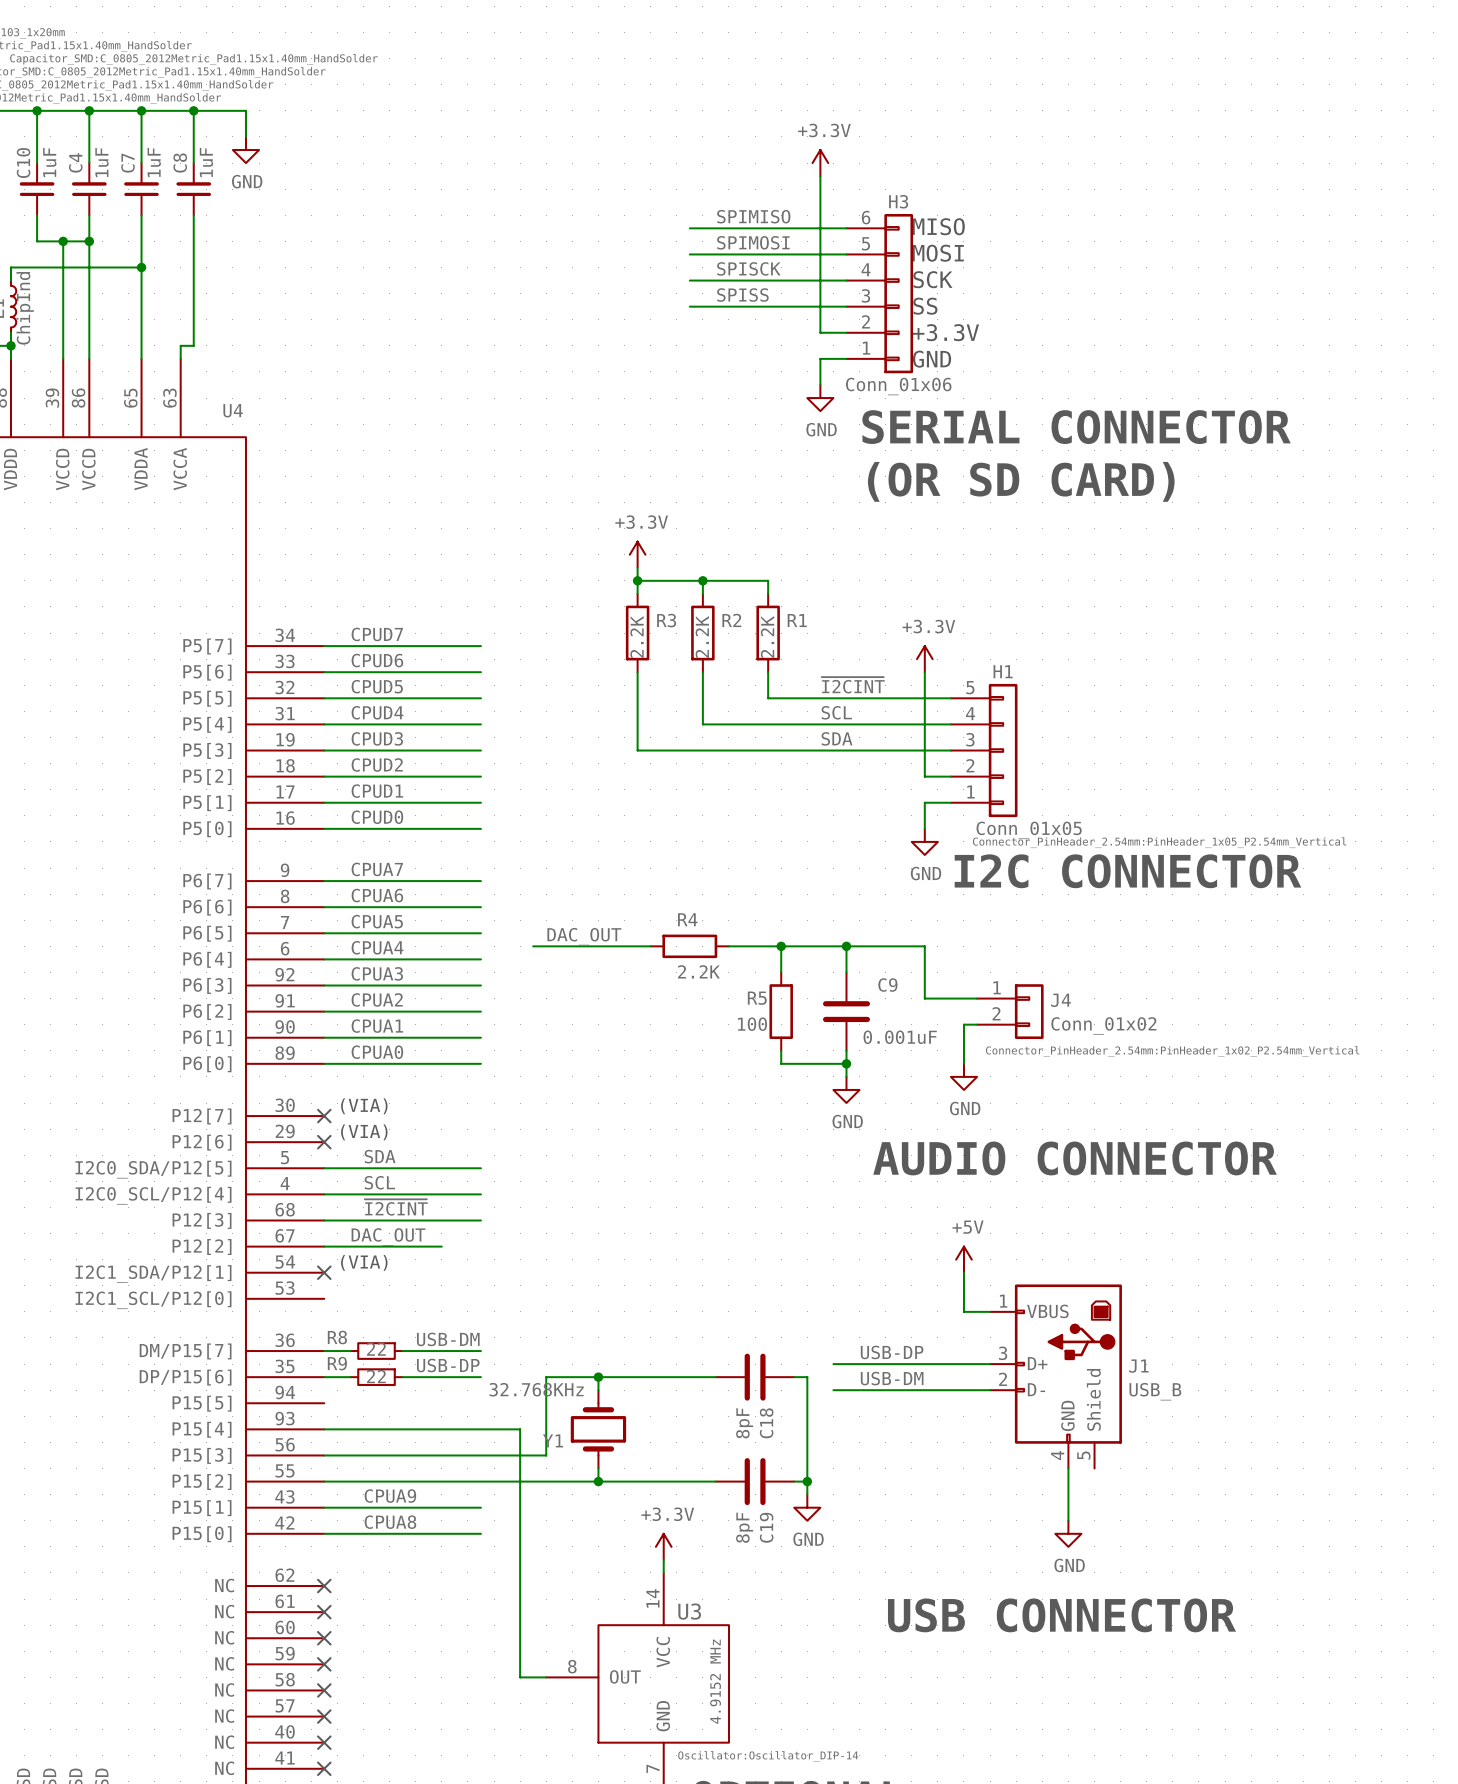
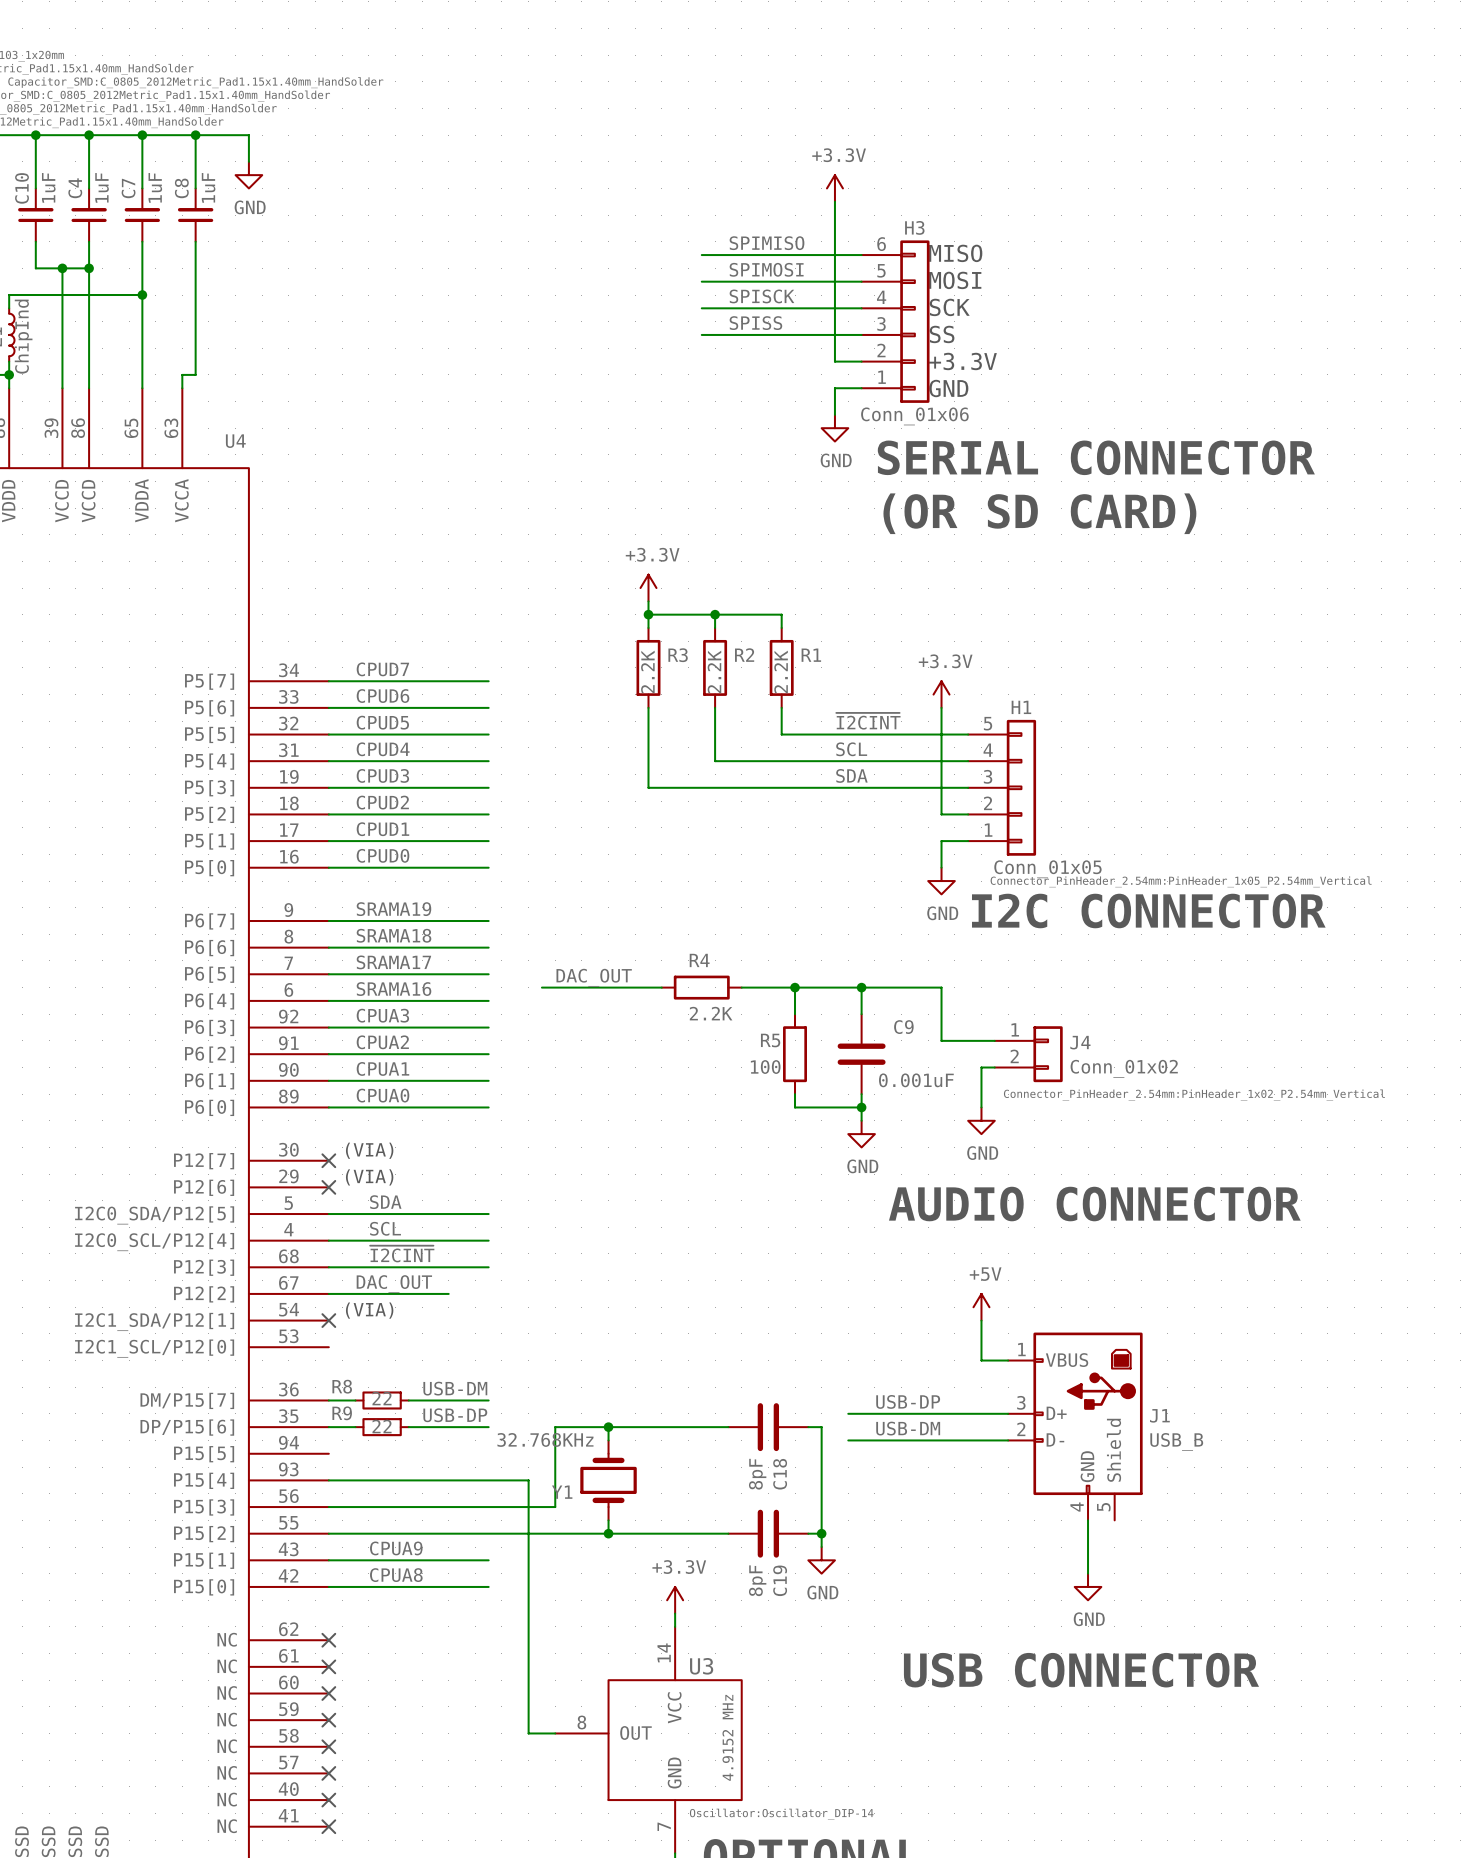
label: CPUA7 (377, 869) -> SRAMA19 (393, 909)
label: CPUA6 (377, 895) -> SRAMA18 (394, 935)
label: CPUA5 (377, 921) -> SRAMA17 (393, 962)
label: CPUA4 (377, 947) -> SRAMA16 (393, 989)

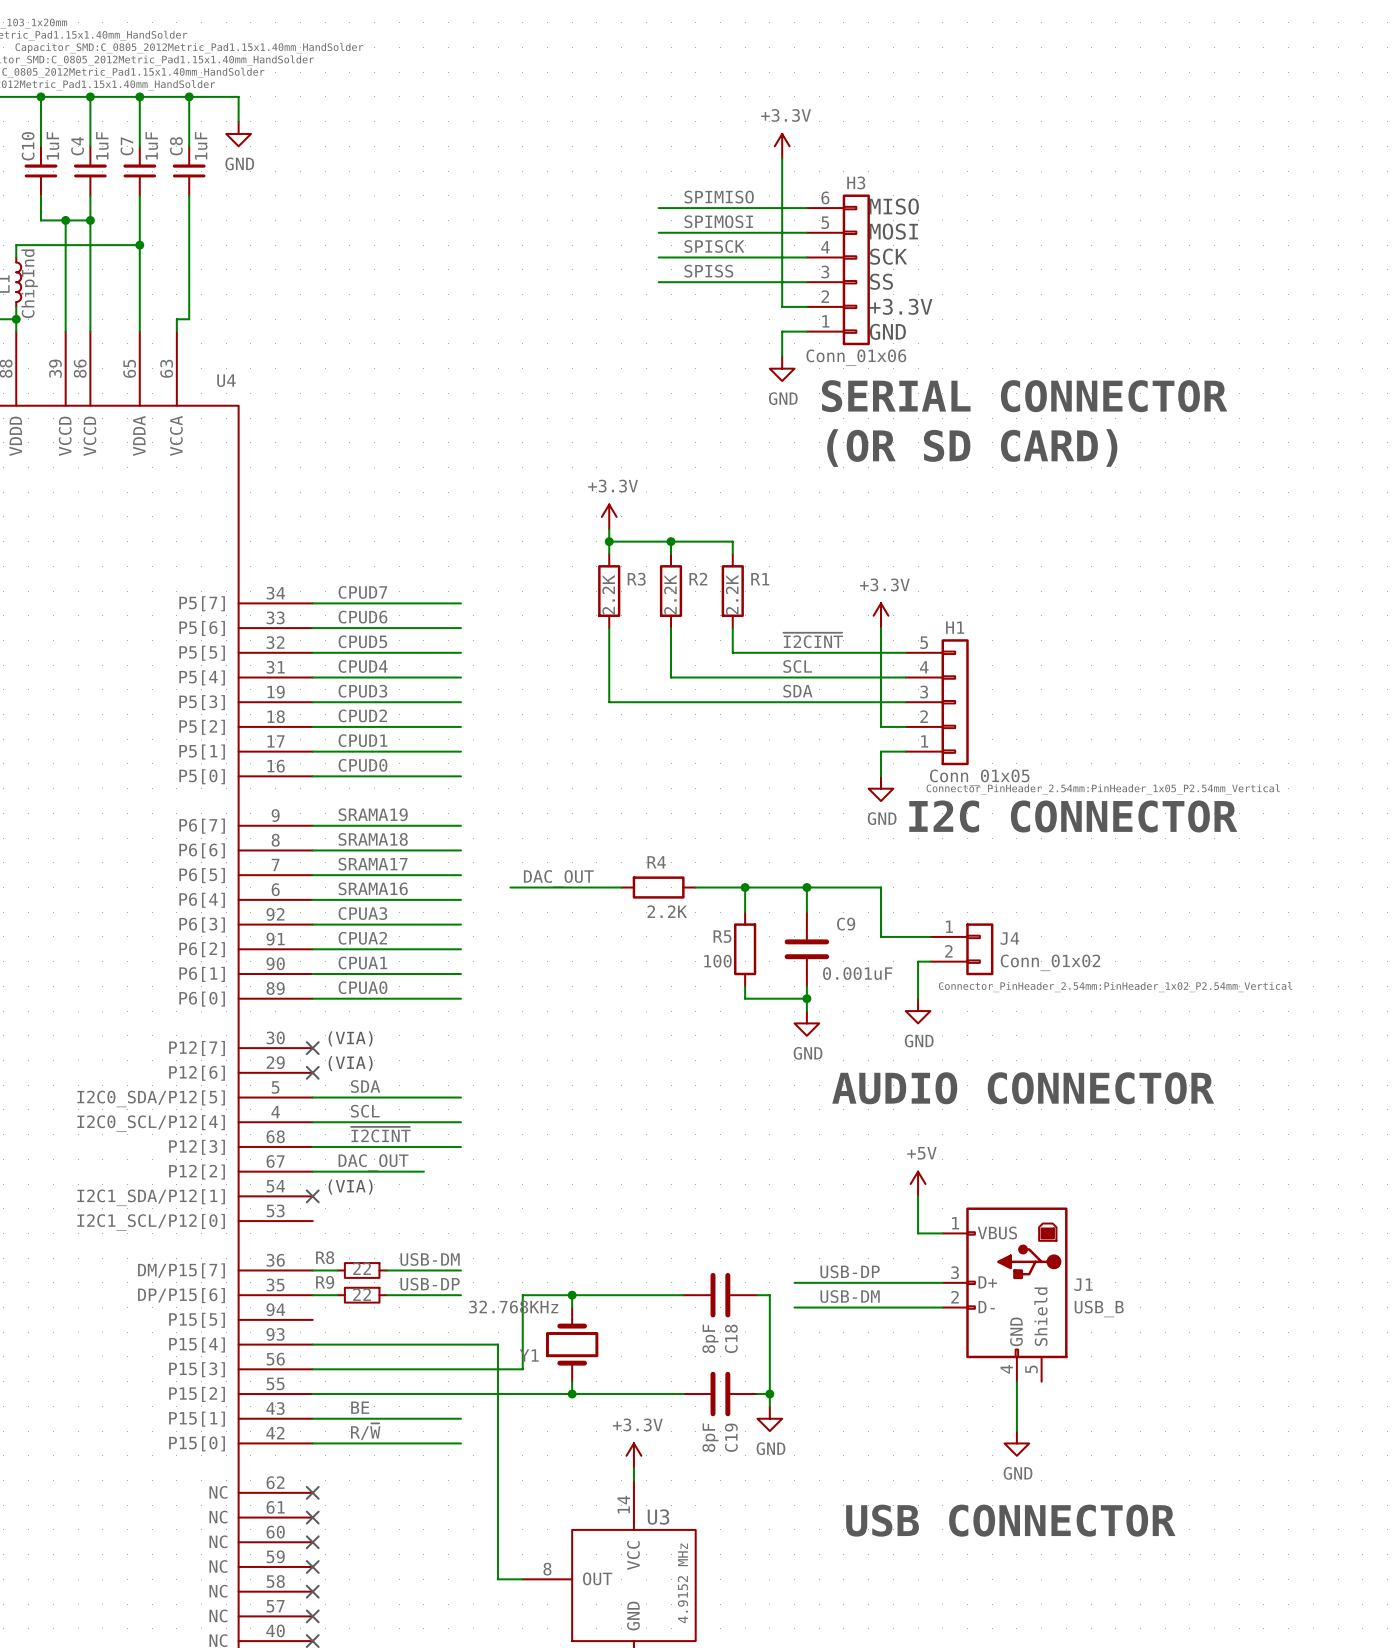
label: CPUA9 (396, 1548) -> BE (360, 1407)
label: CPUA8 (396, 1575) -> R/~{W} (365, 1431)

